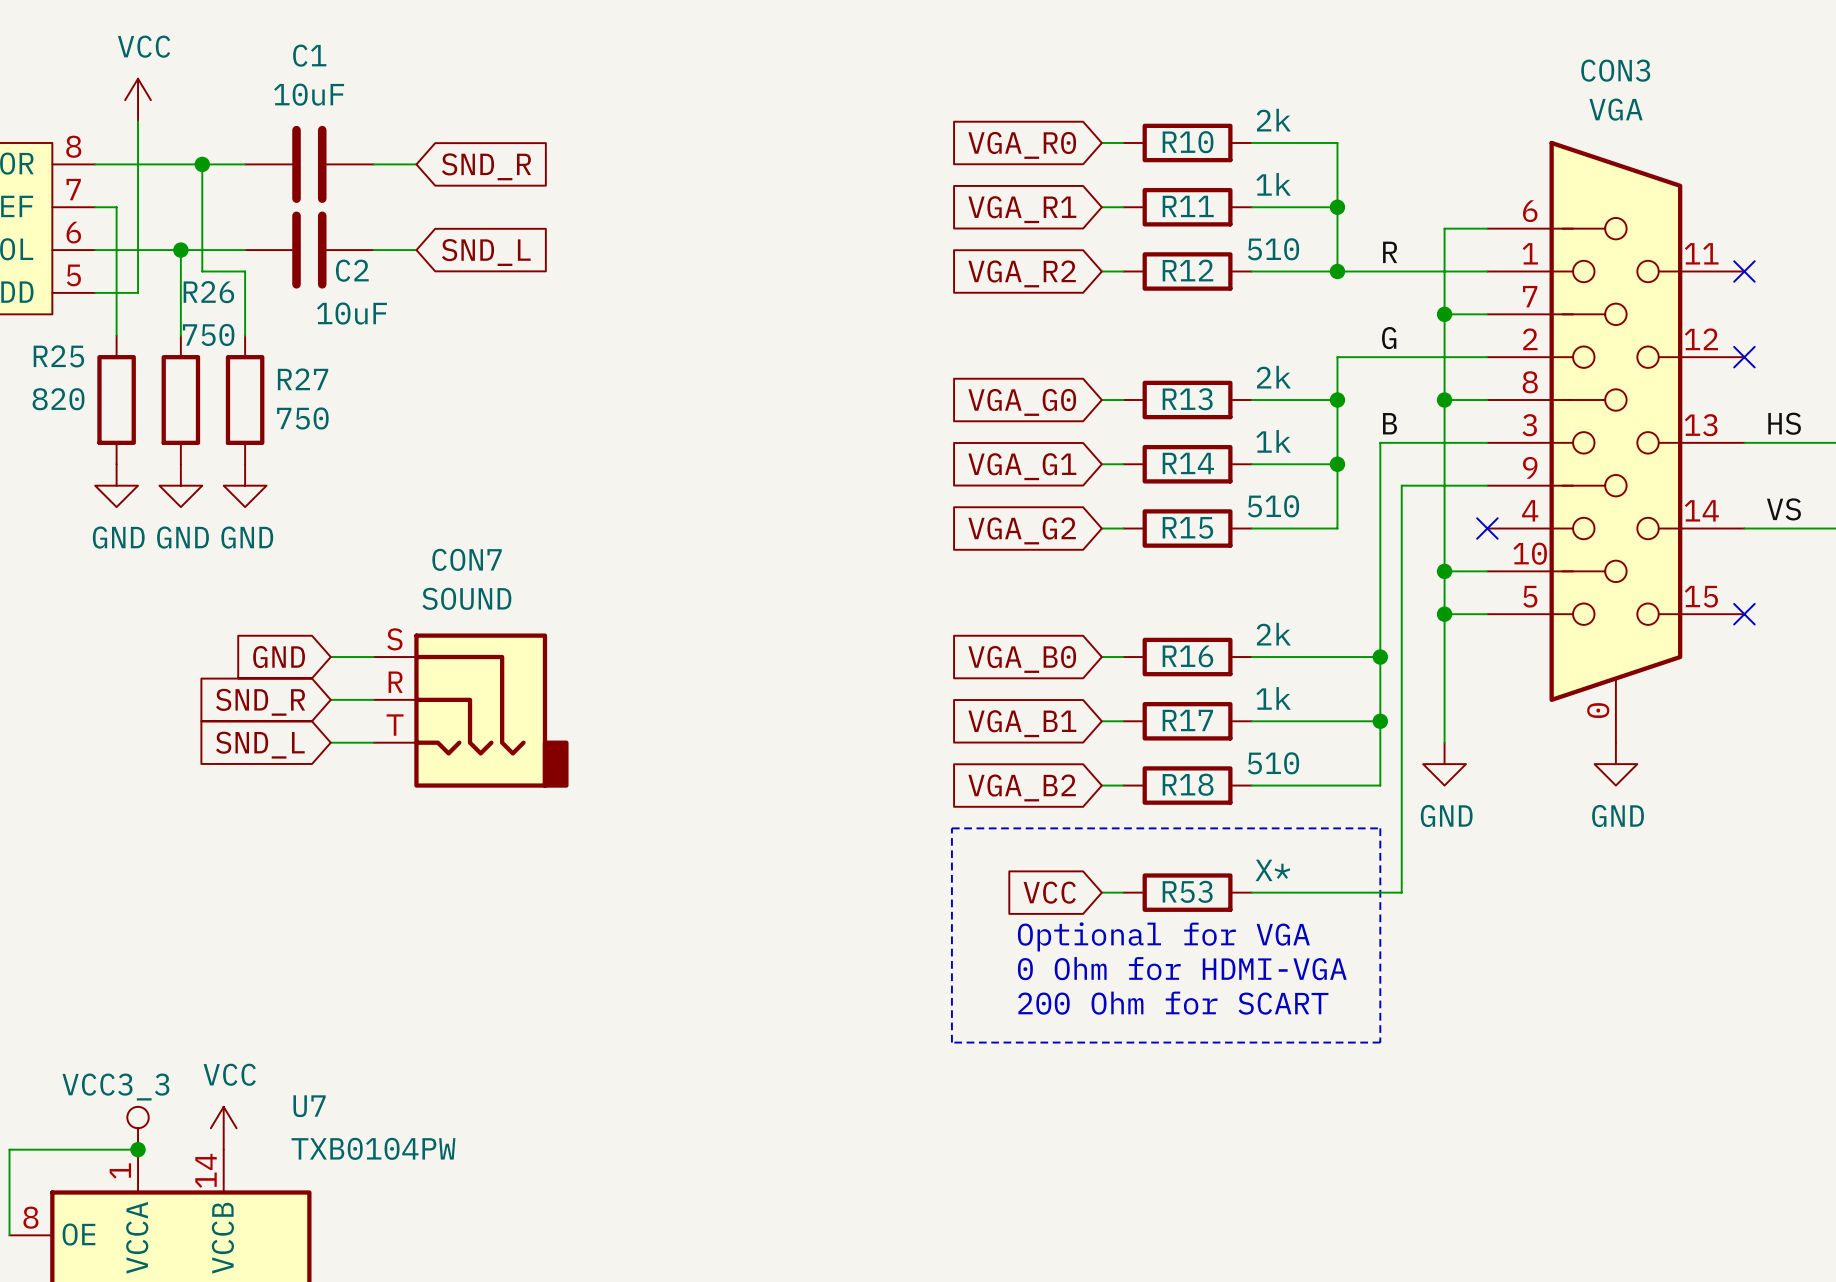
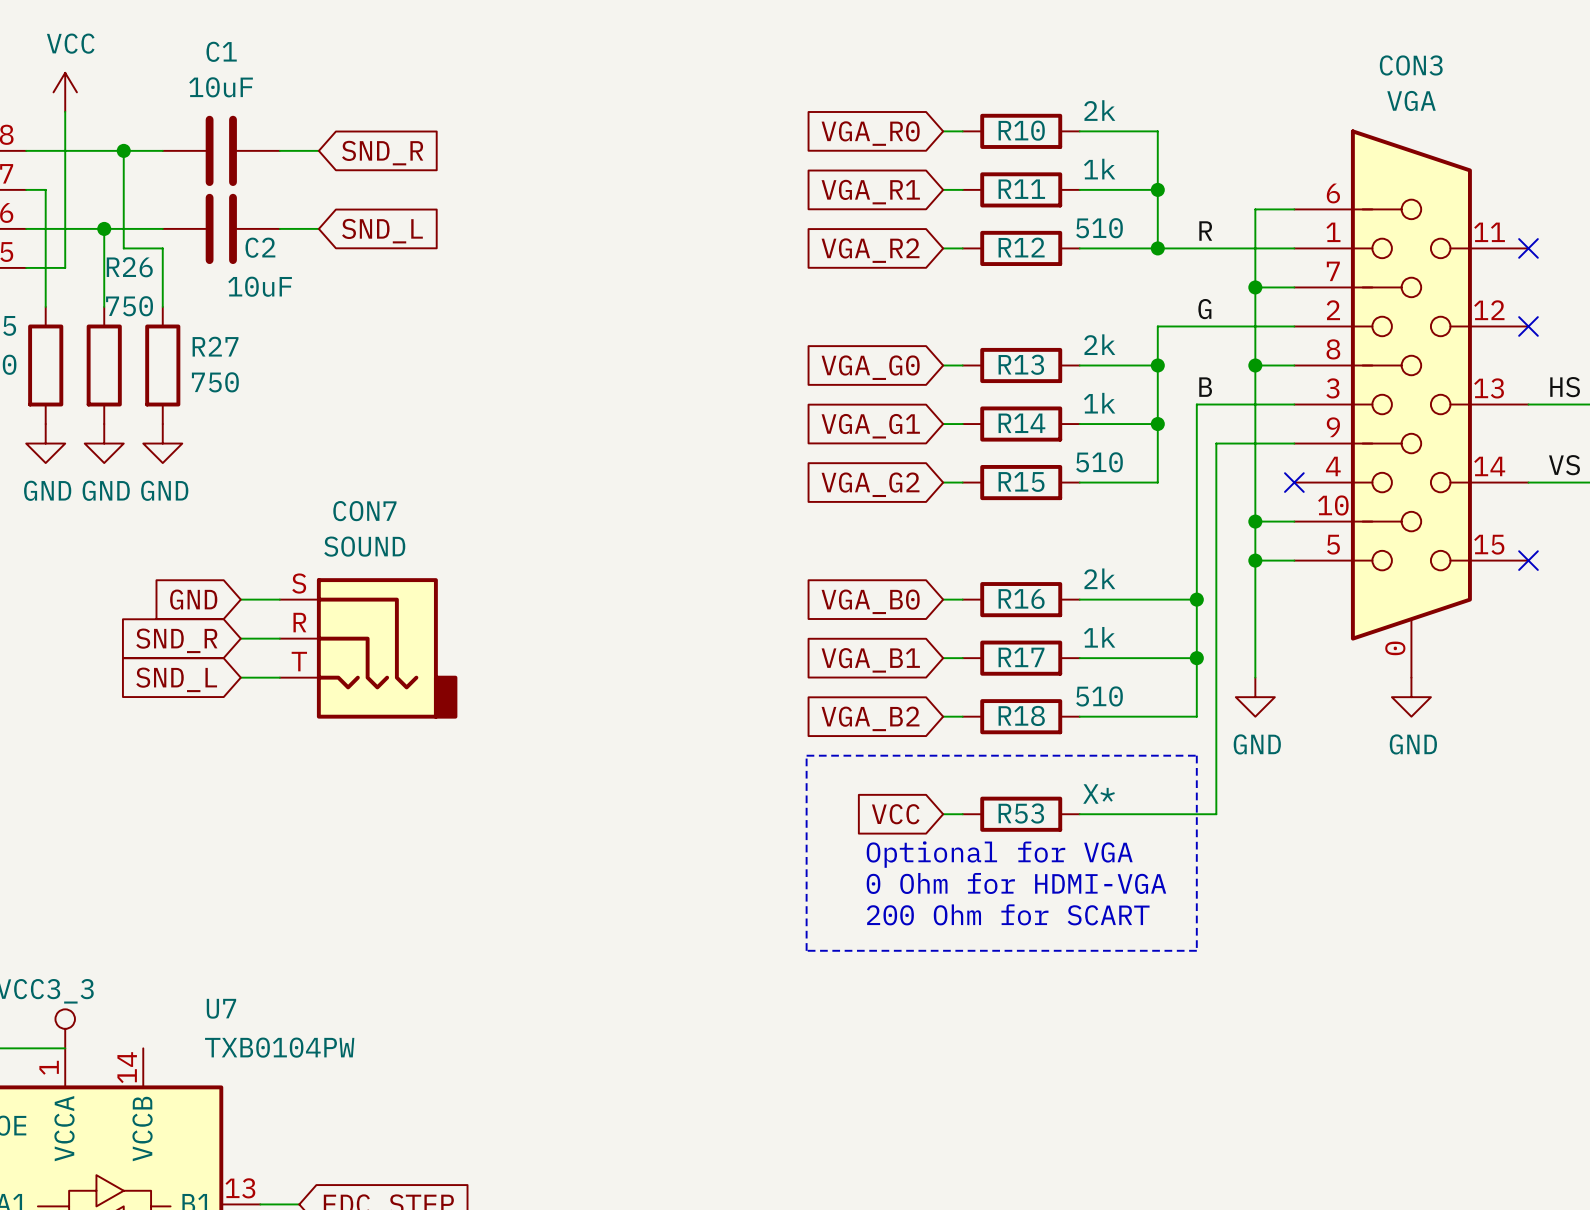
power symbol: VCC (223, 1128) -> none
junction: (138, 1149) -> none

